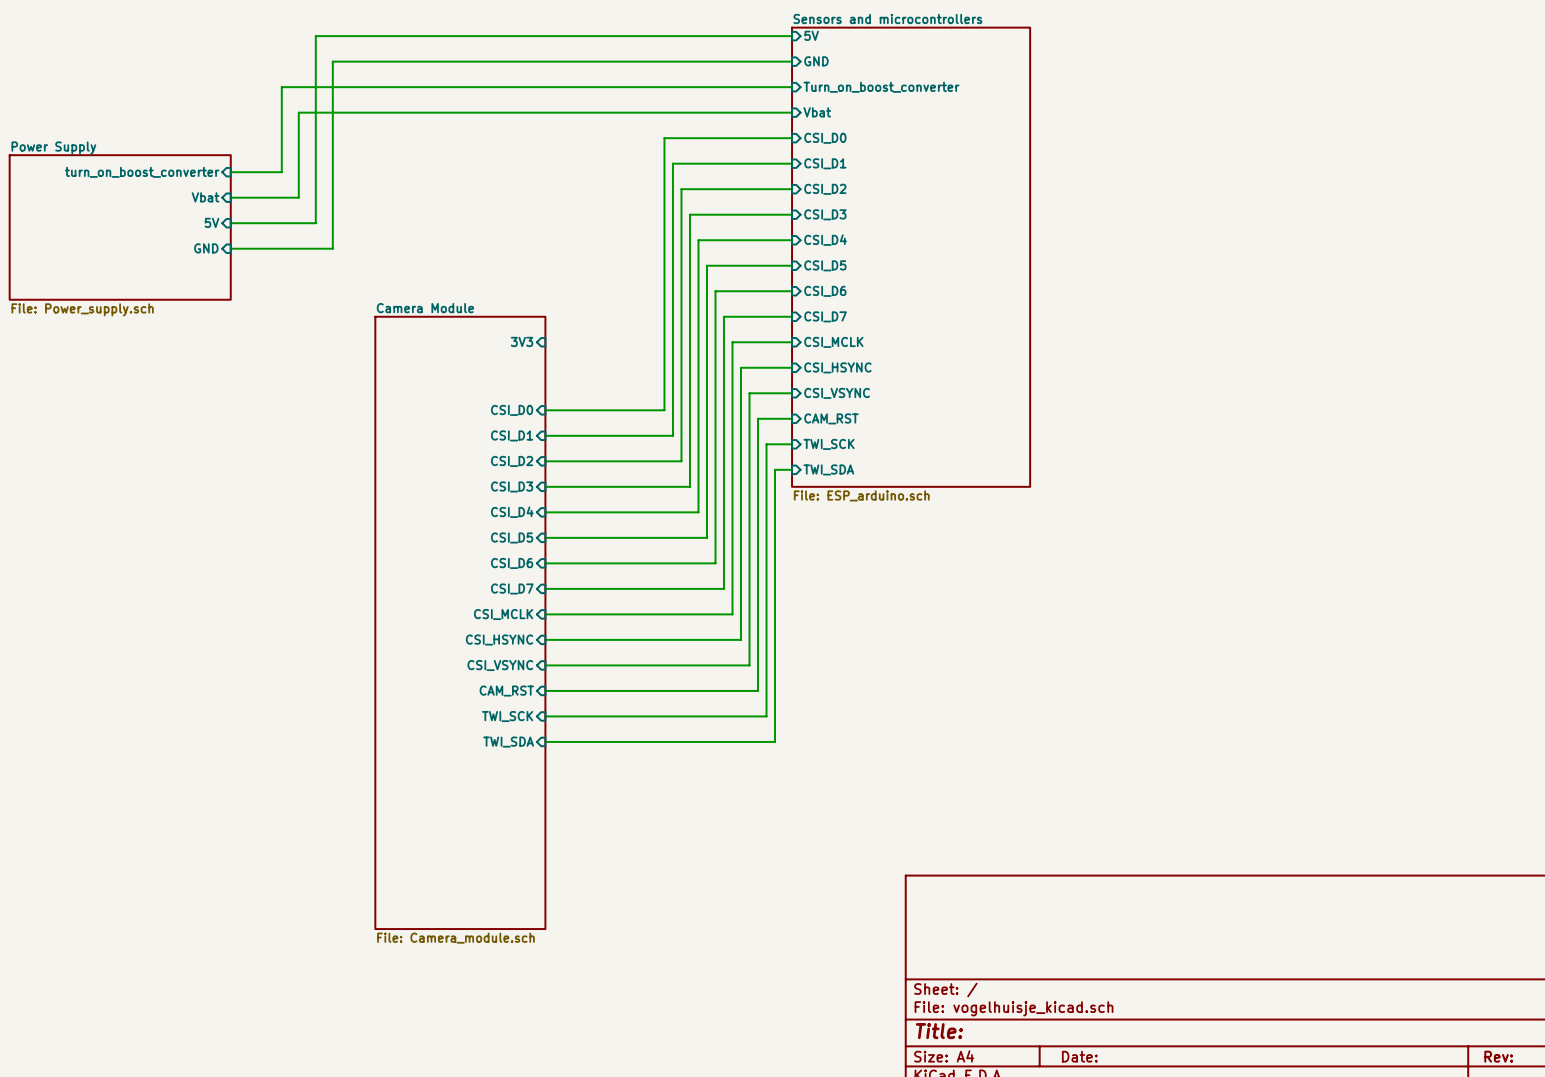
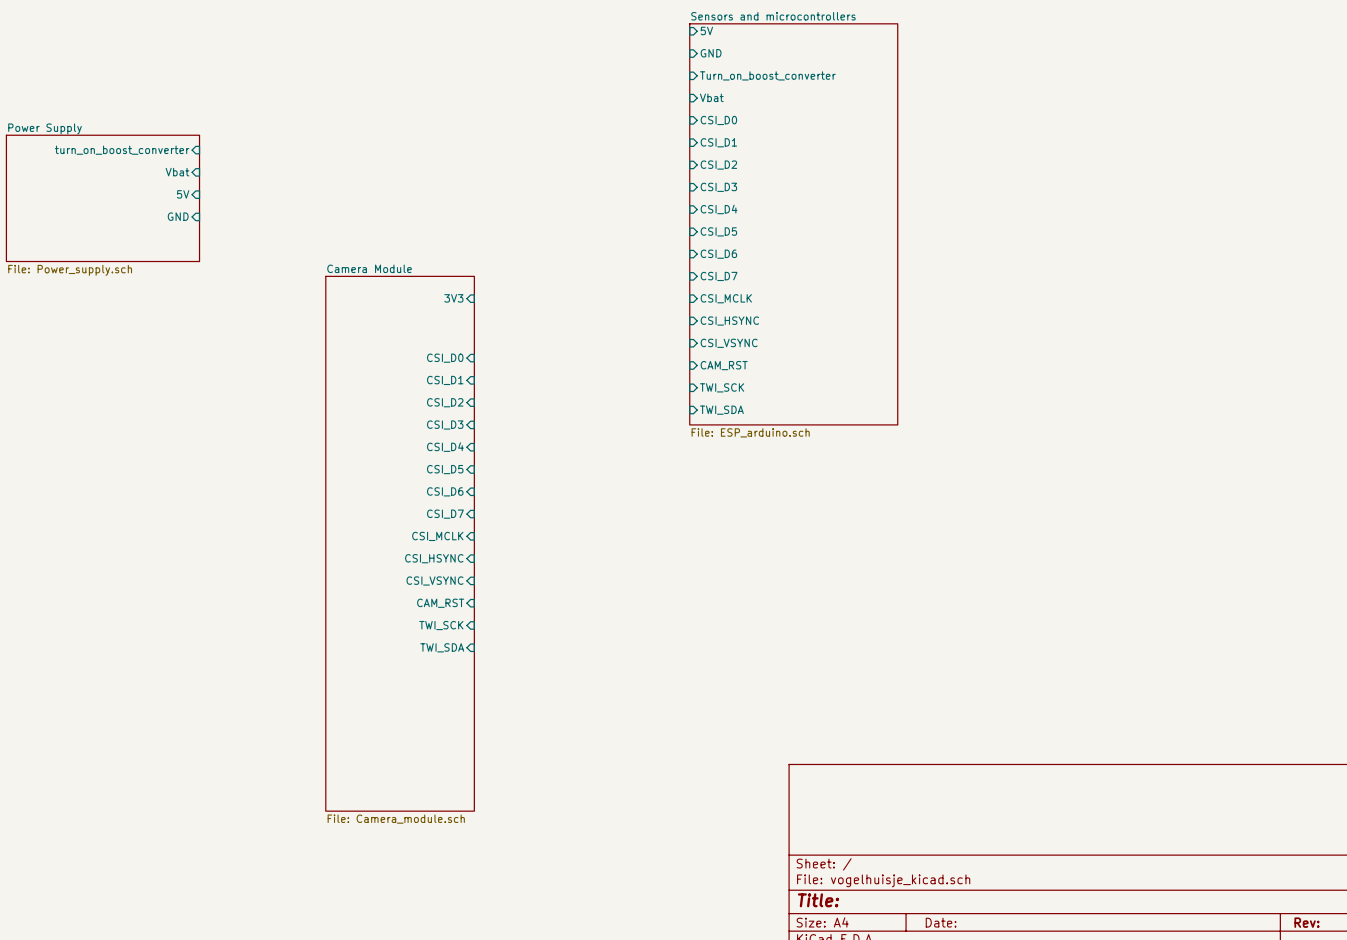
wire: (792, 36) (315, 36) (315, 223) (230, 223) -> none
wire: (792, 61) (332, 61) (332, 248) (230, 248) -> none
wire: (792, 87) (281, 87) (281, 172) (230, 172) -> none
wire: (792, 112) (298, 112) (298, 197) (230, 197) -> none
wire: (792, 138) (664, 138) (664, 410) (545, 410) -> none
wire: (792, 163) (672, 163) (672, 435) (545, 435) -> none
wire: (792, 189) (681, 189) (681, 461) (545, 461) -> none
wire: (792, 214) (689, 214) (689, 486) (545, 486) -> none
wire: (792, 240) (698, 240) (698, 512) (545, 512) -> none
wire: (792, 265) (706, 265) (706, 537) (545, 537) -> none
wire: (792, 291) (715, 291) (715, 563) (545, 563) -> none
wire: (792, 316) (723, 316) (723, 588) (545, 588) -> none
wire: (792, 342) (732, 342) (732, 614) (545, 614) -> none
wire: (792, 367) (741, 367) (741, 639) (545, 639) -> none
wire: (792, 393) (749, 393) (749, 665) (545, 665) -> none
wire: (792, 418) (758, 418) (758, 690) (545, 690) -> none
wire: (792, 444) (766, 444) (766, 716) (545, 716) -> none
wire: (792, 469) (775, 469) (775, 741) (545, 741) -> none

